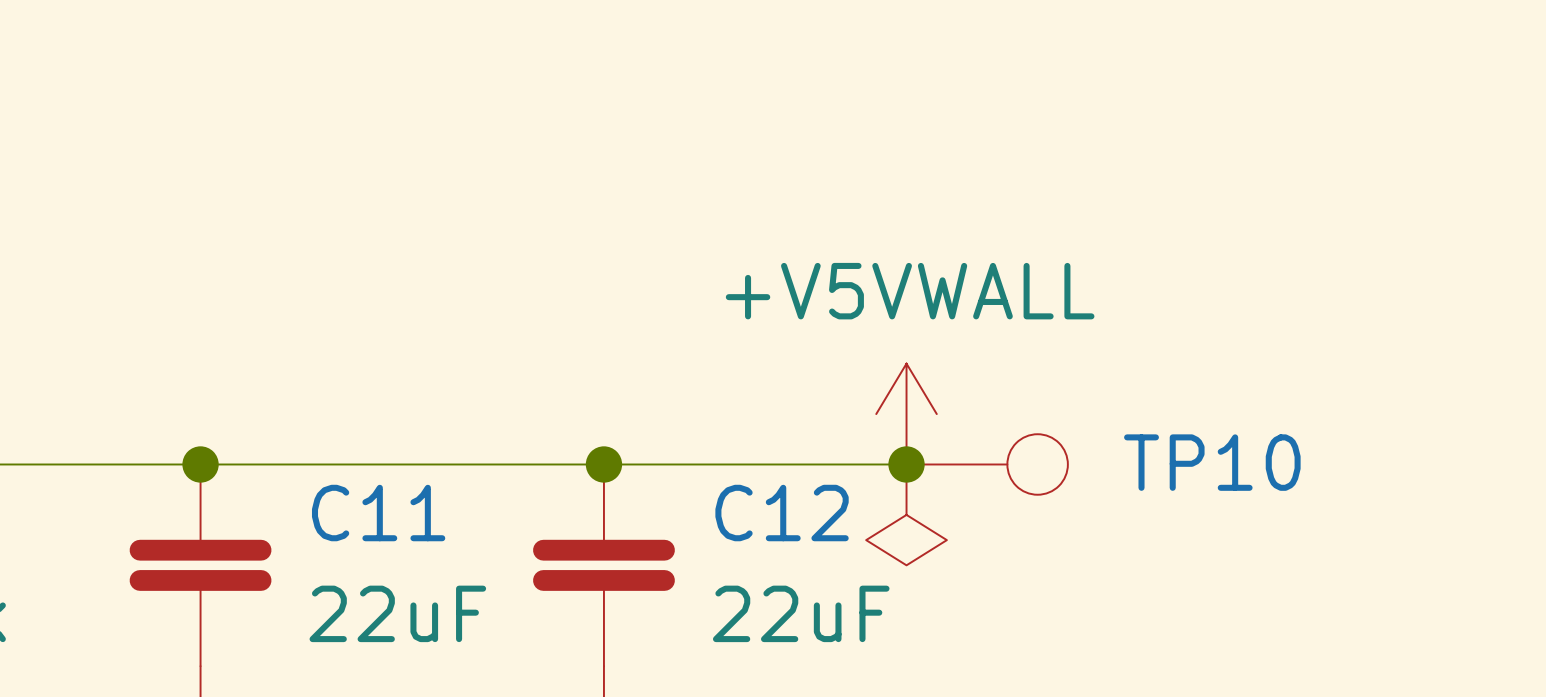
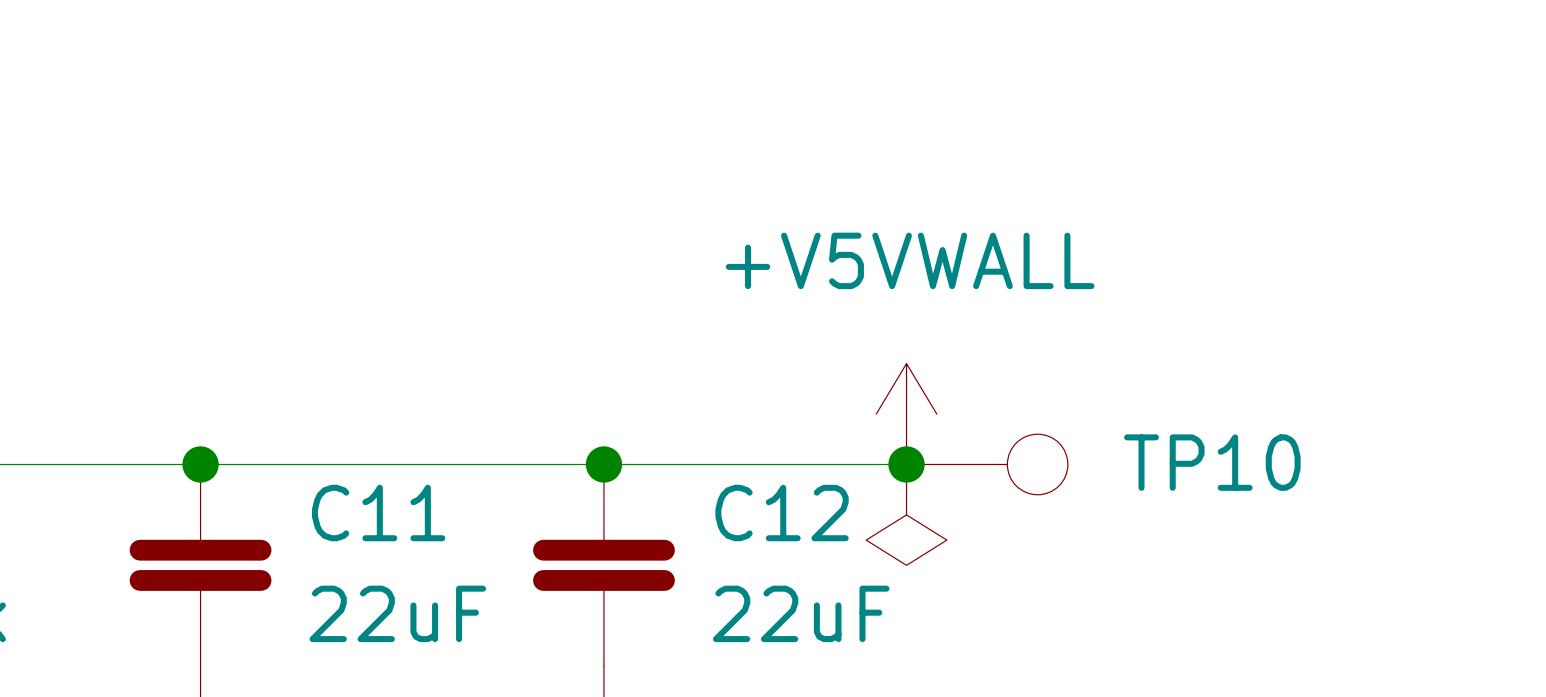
power symbol text position: +V5VWALL (910, 291) -> +V5VWALL (910, 260)

